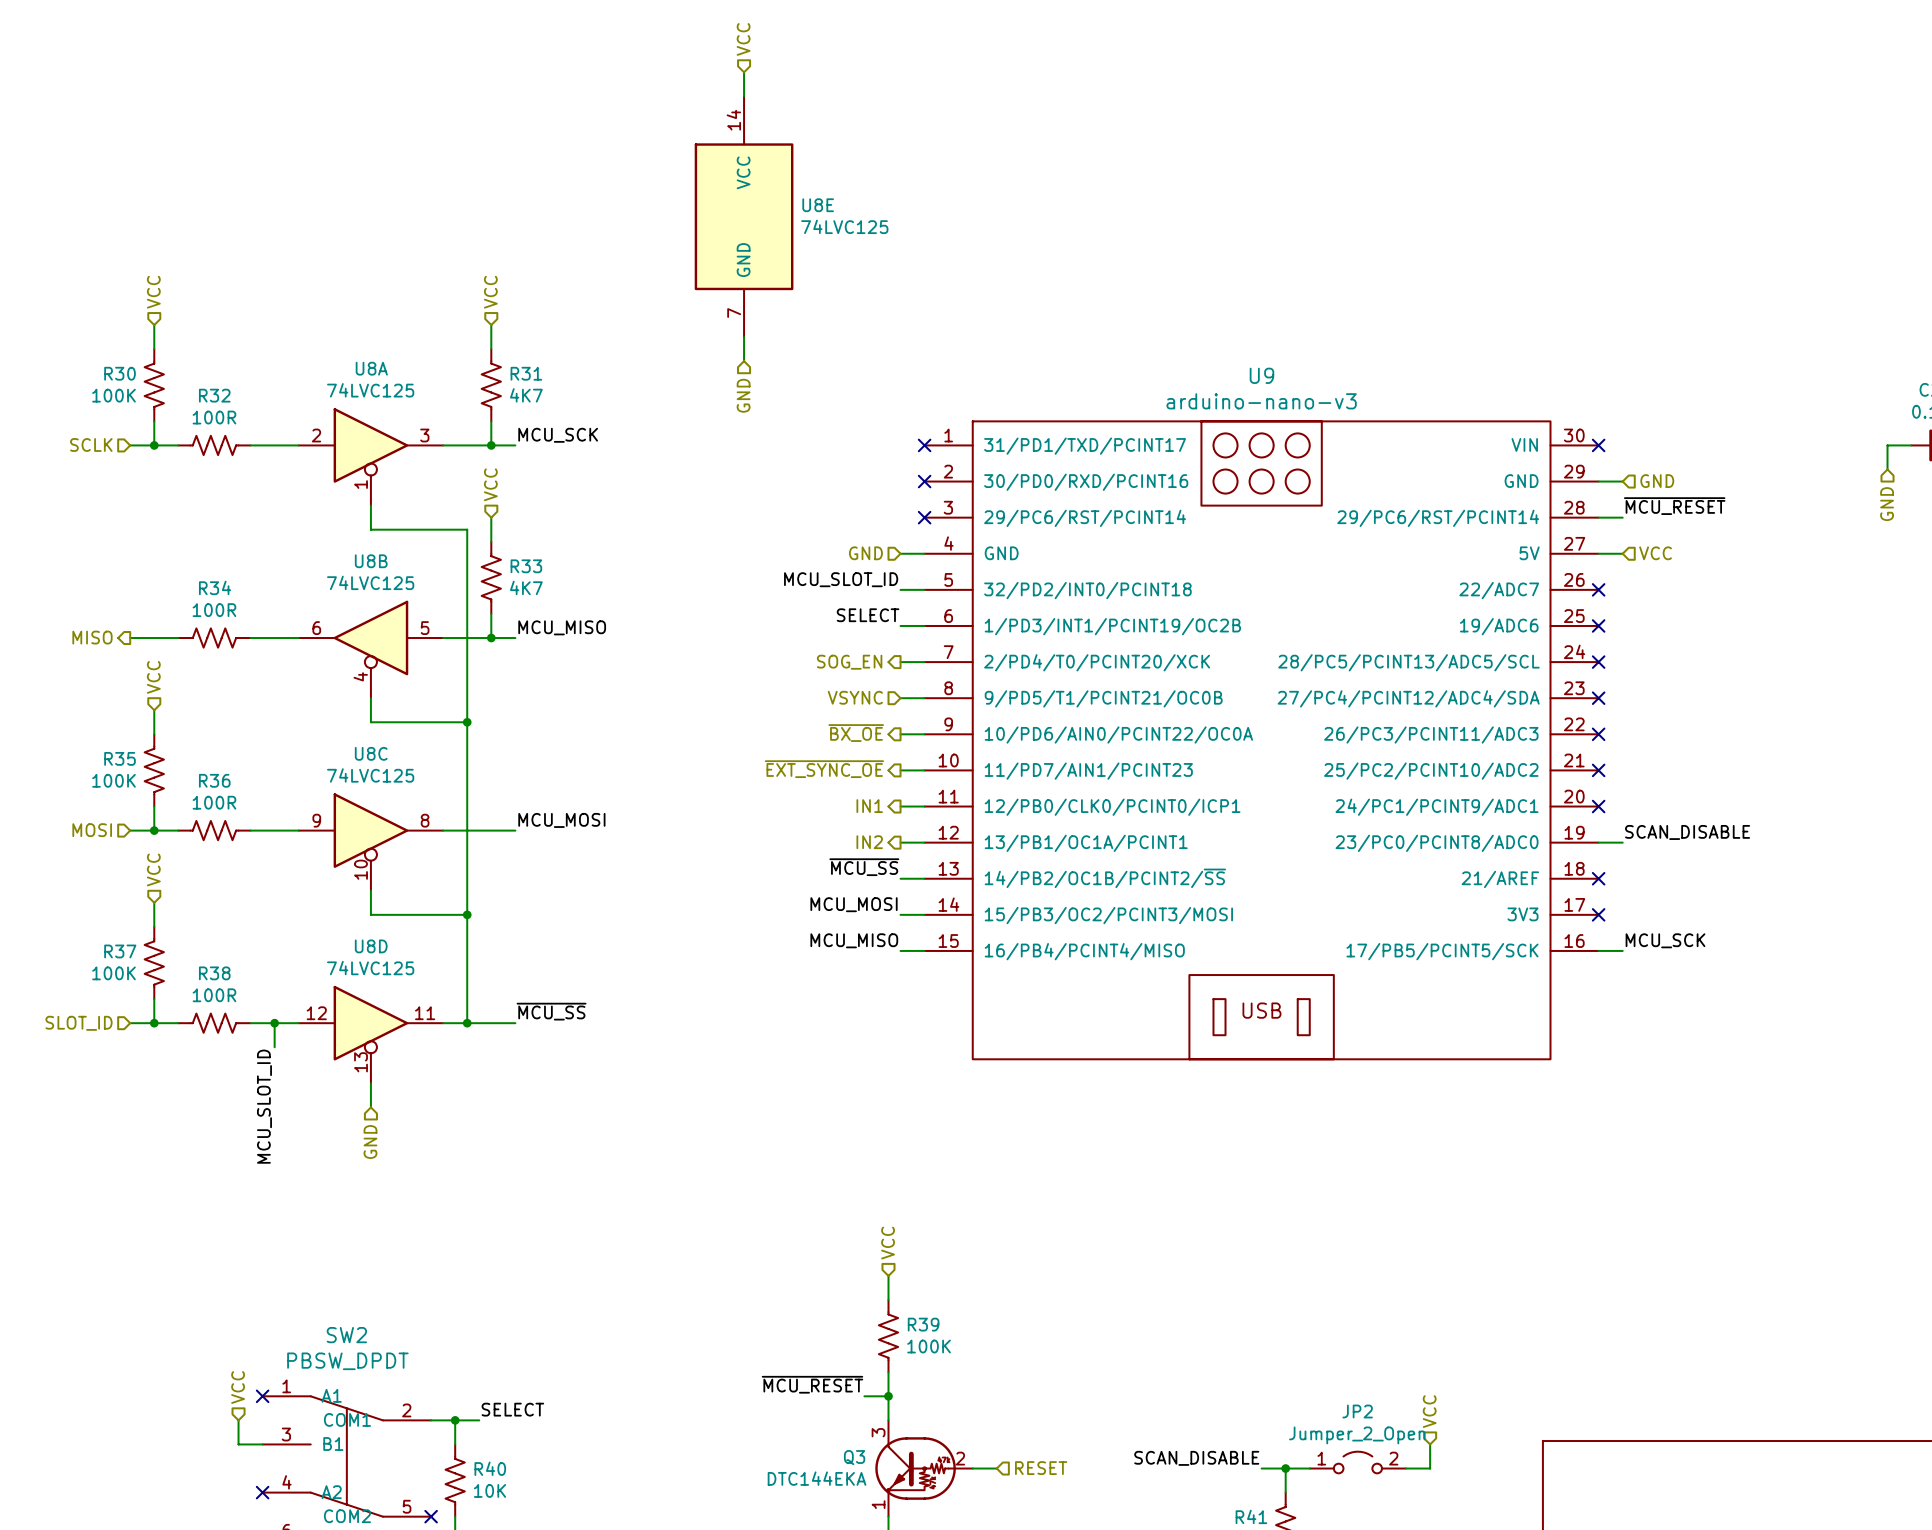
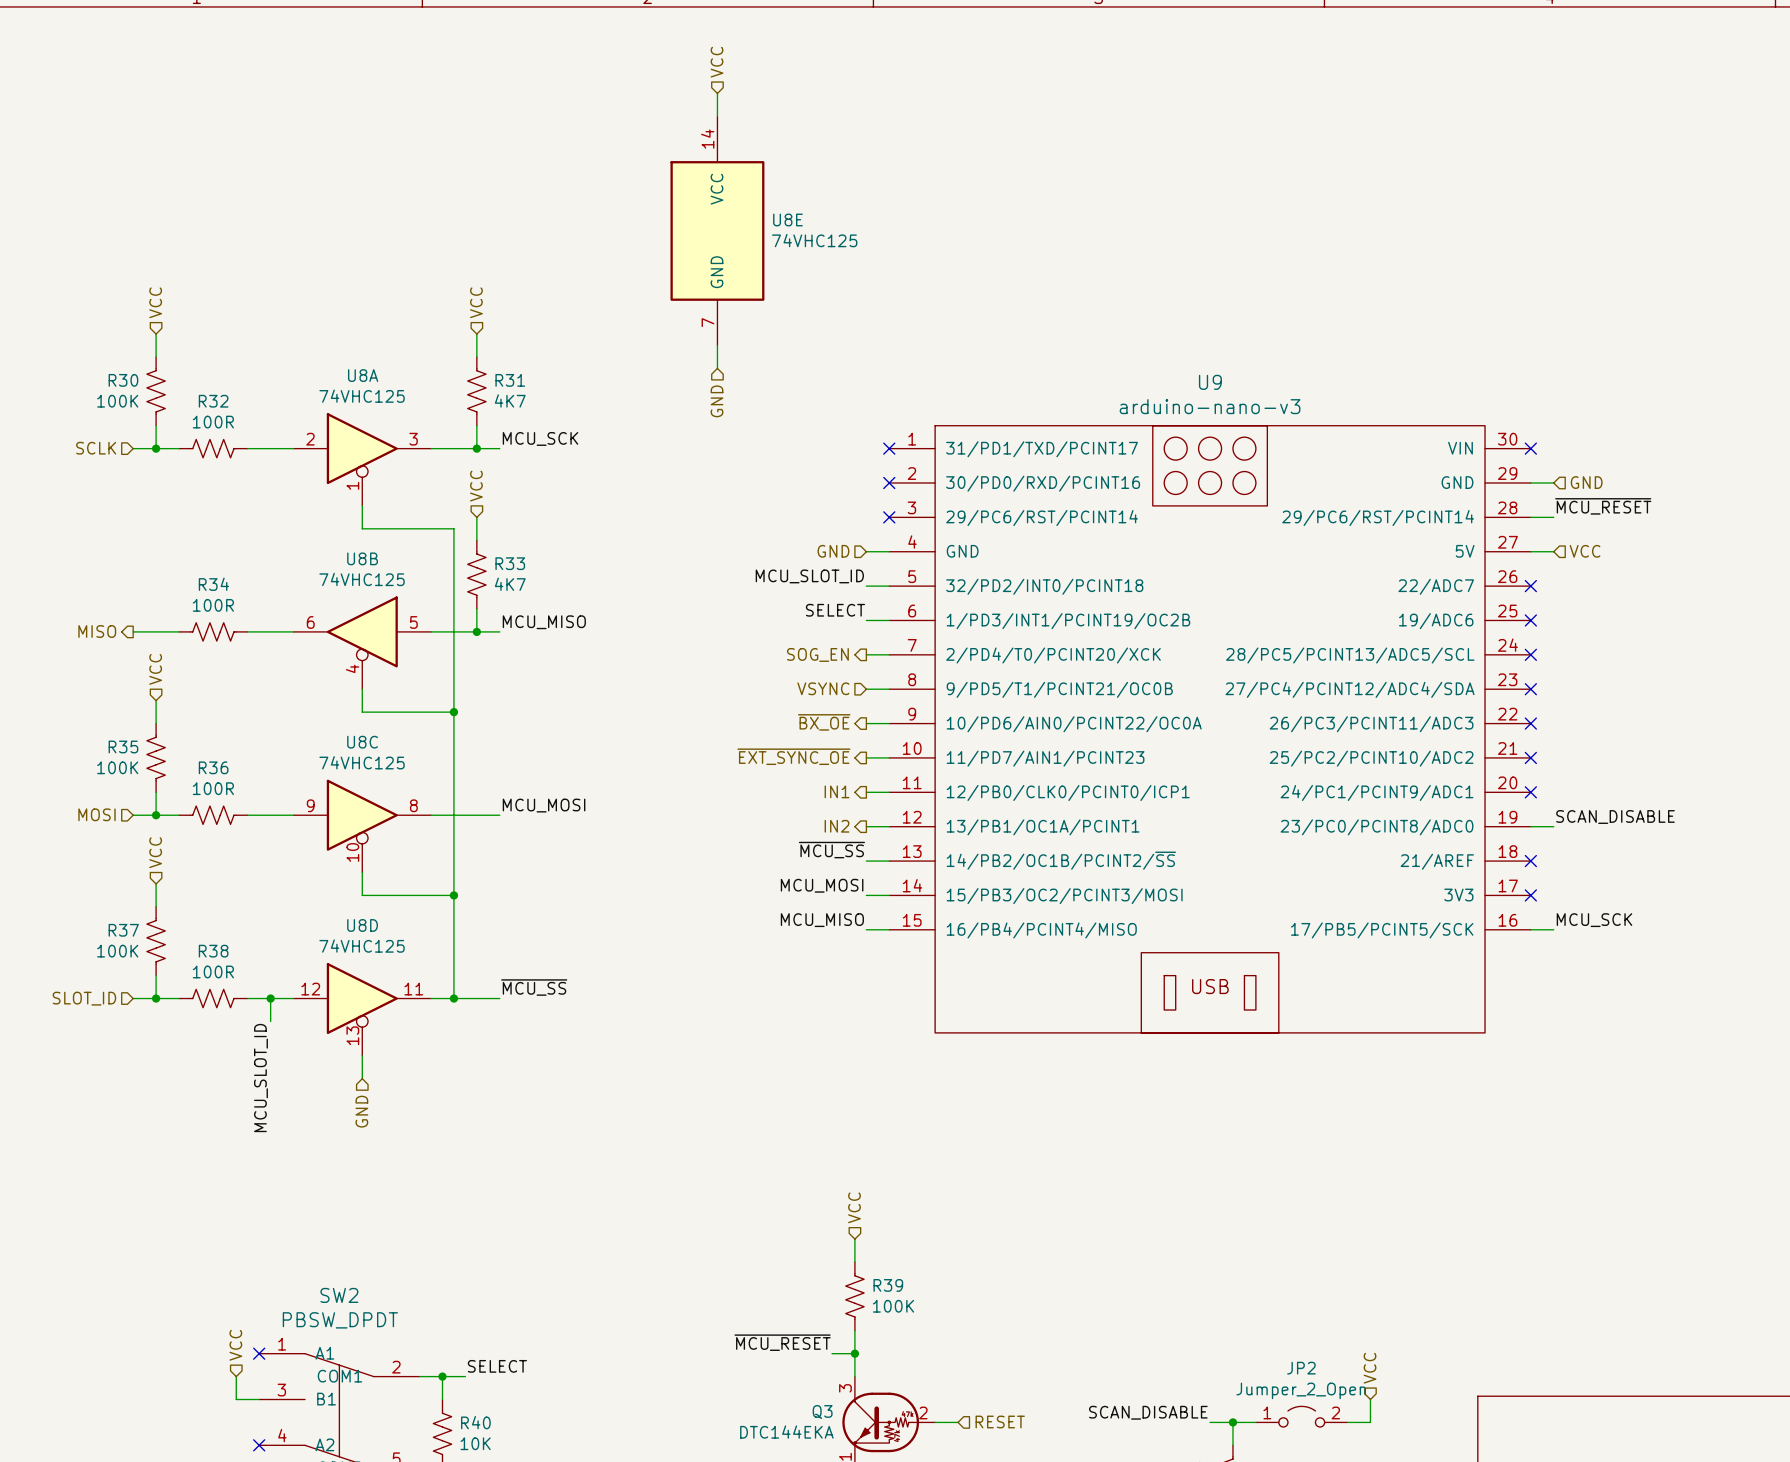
U8E value: 74LVC125 (844, 226) -> 74VHC125 (814, 240)
U8A value: 74LVC125 (370, 390) -> 74VHC125 (362, 396)
U8B value: 74LVC125 (370, 582) -> 74VHC125 (362, 579)
U8C value: 74LVC125 (370, 775) -> 74VHC125 (362, 762)
U8D value: 74LVC125 (370, 968) -> 74VHC125 (362, 946)

